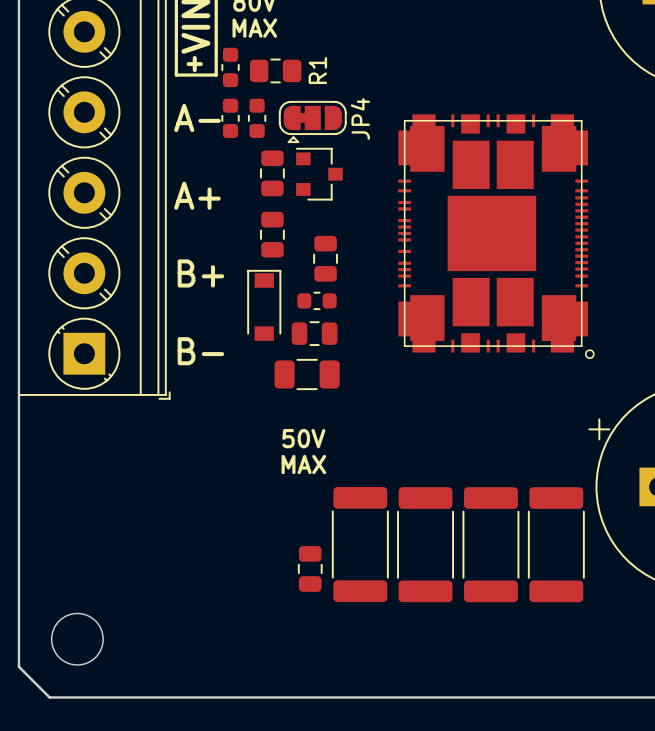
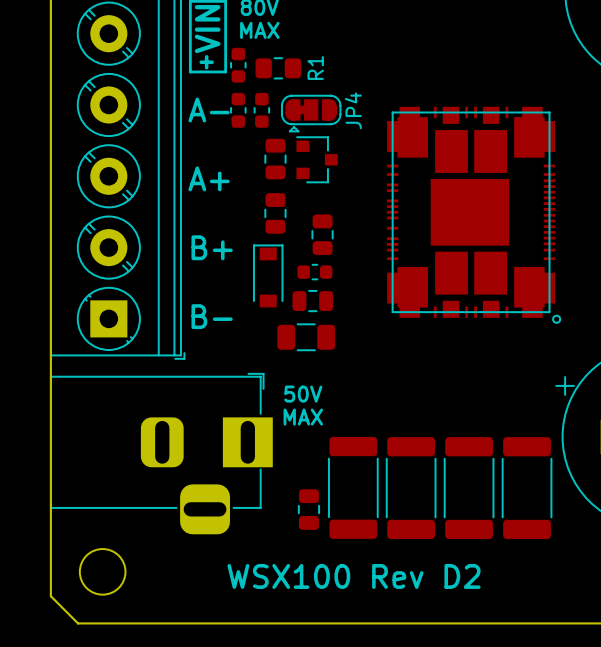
part: none -> (161, 453)
text: none -> WSX100 Rev D2 (354, 576)

